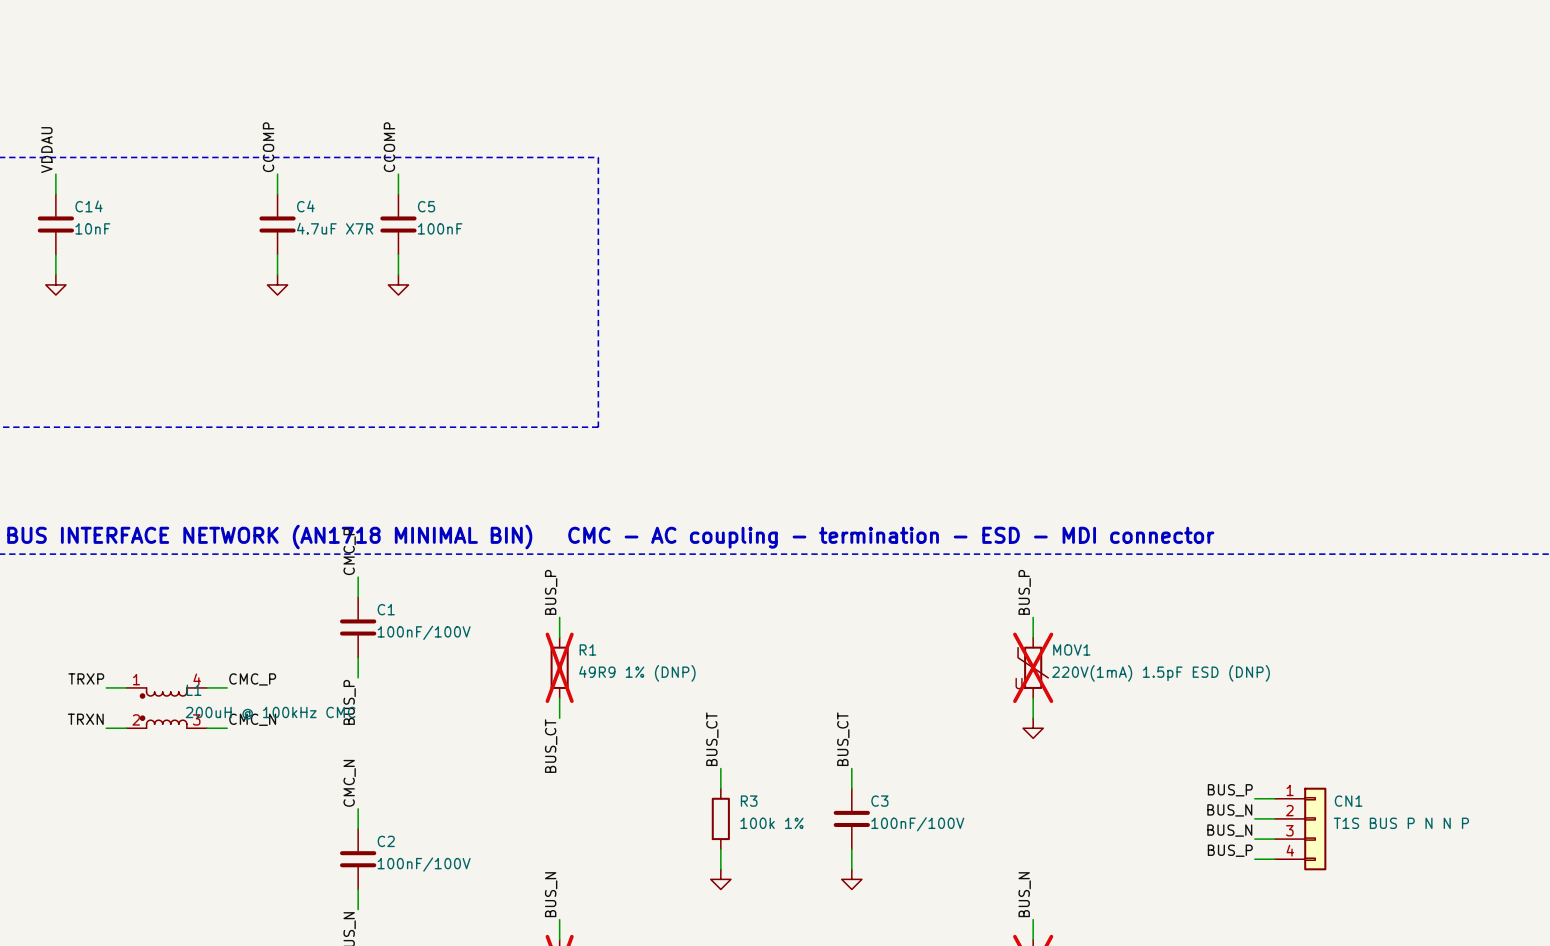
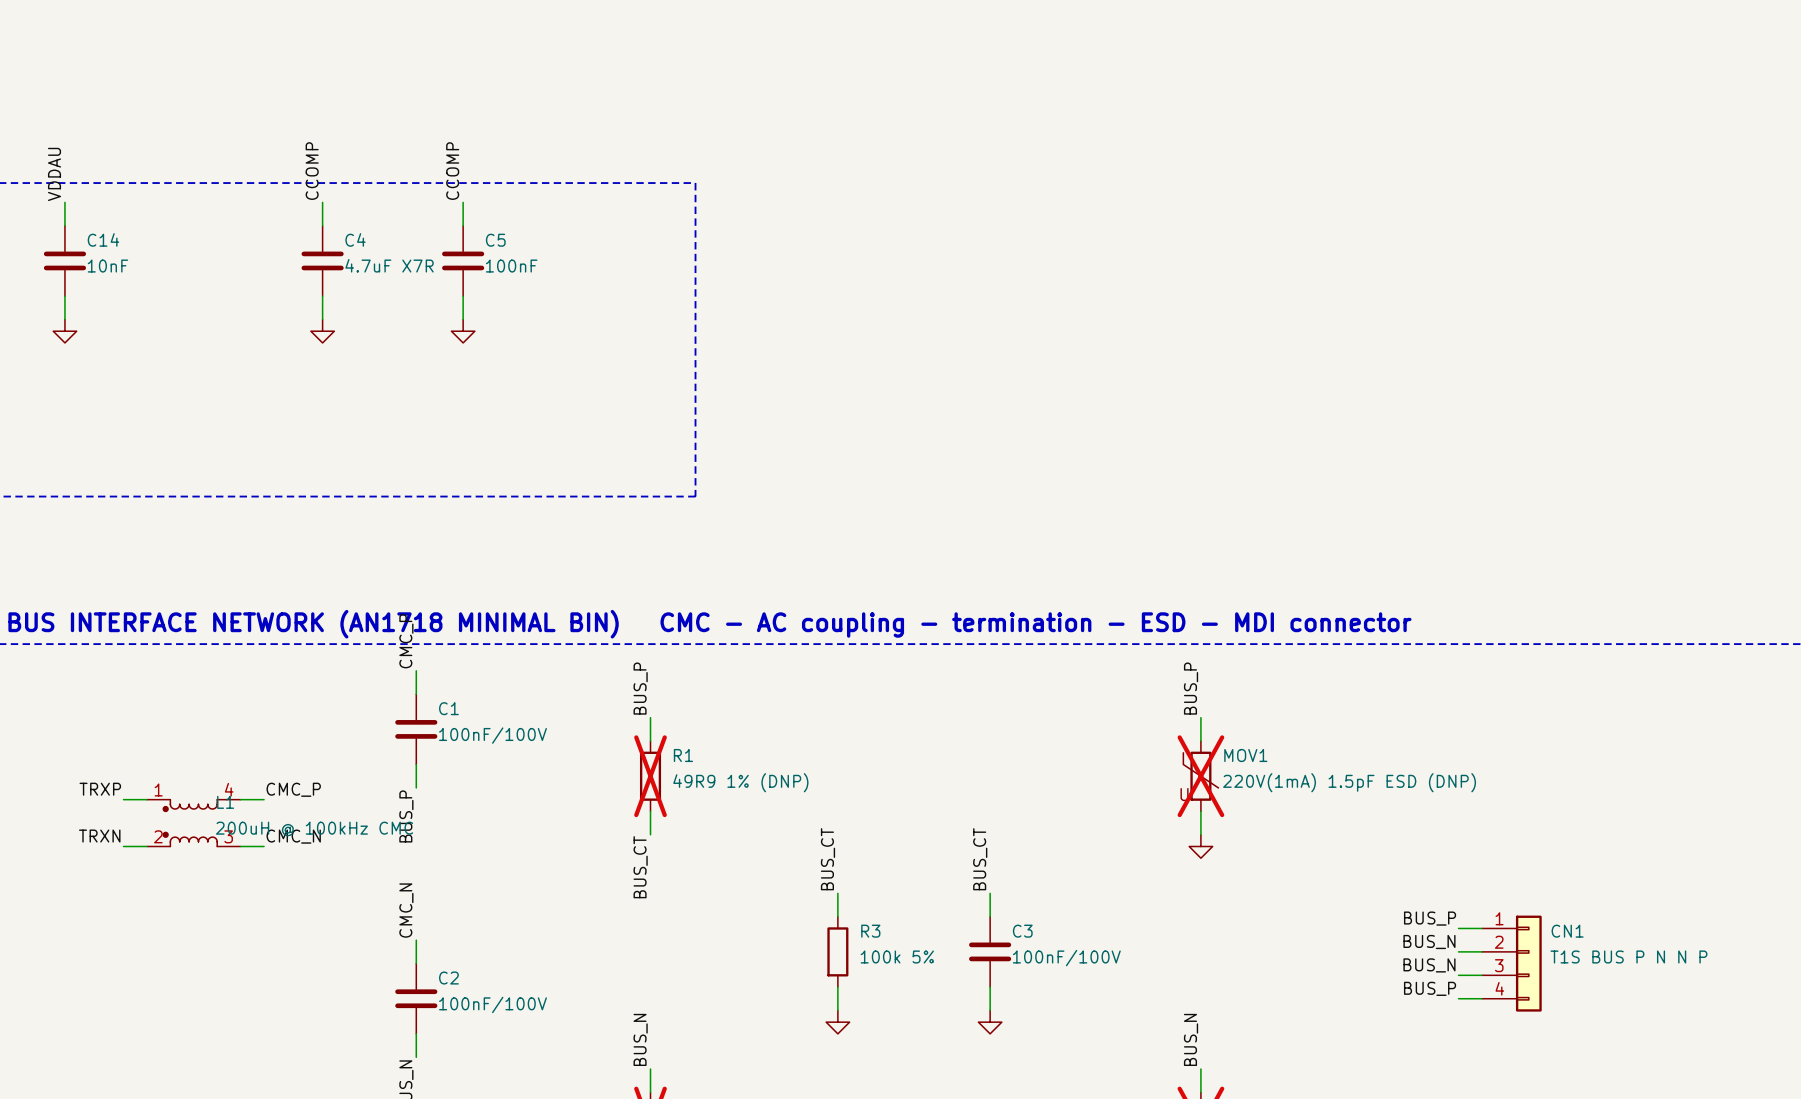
R3 value: 100k 1% (771, 823) -> 100k 5% (897, 956)

